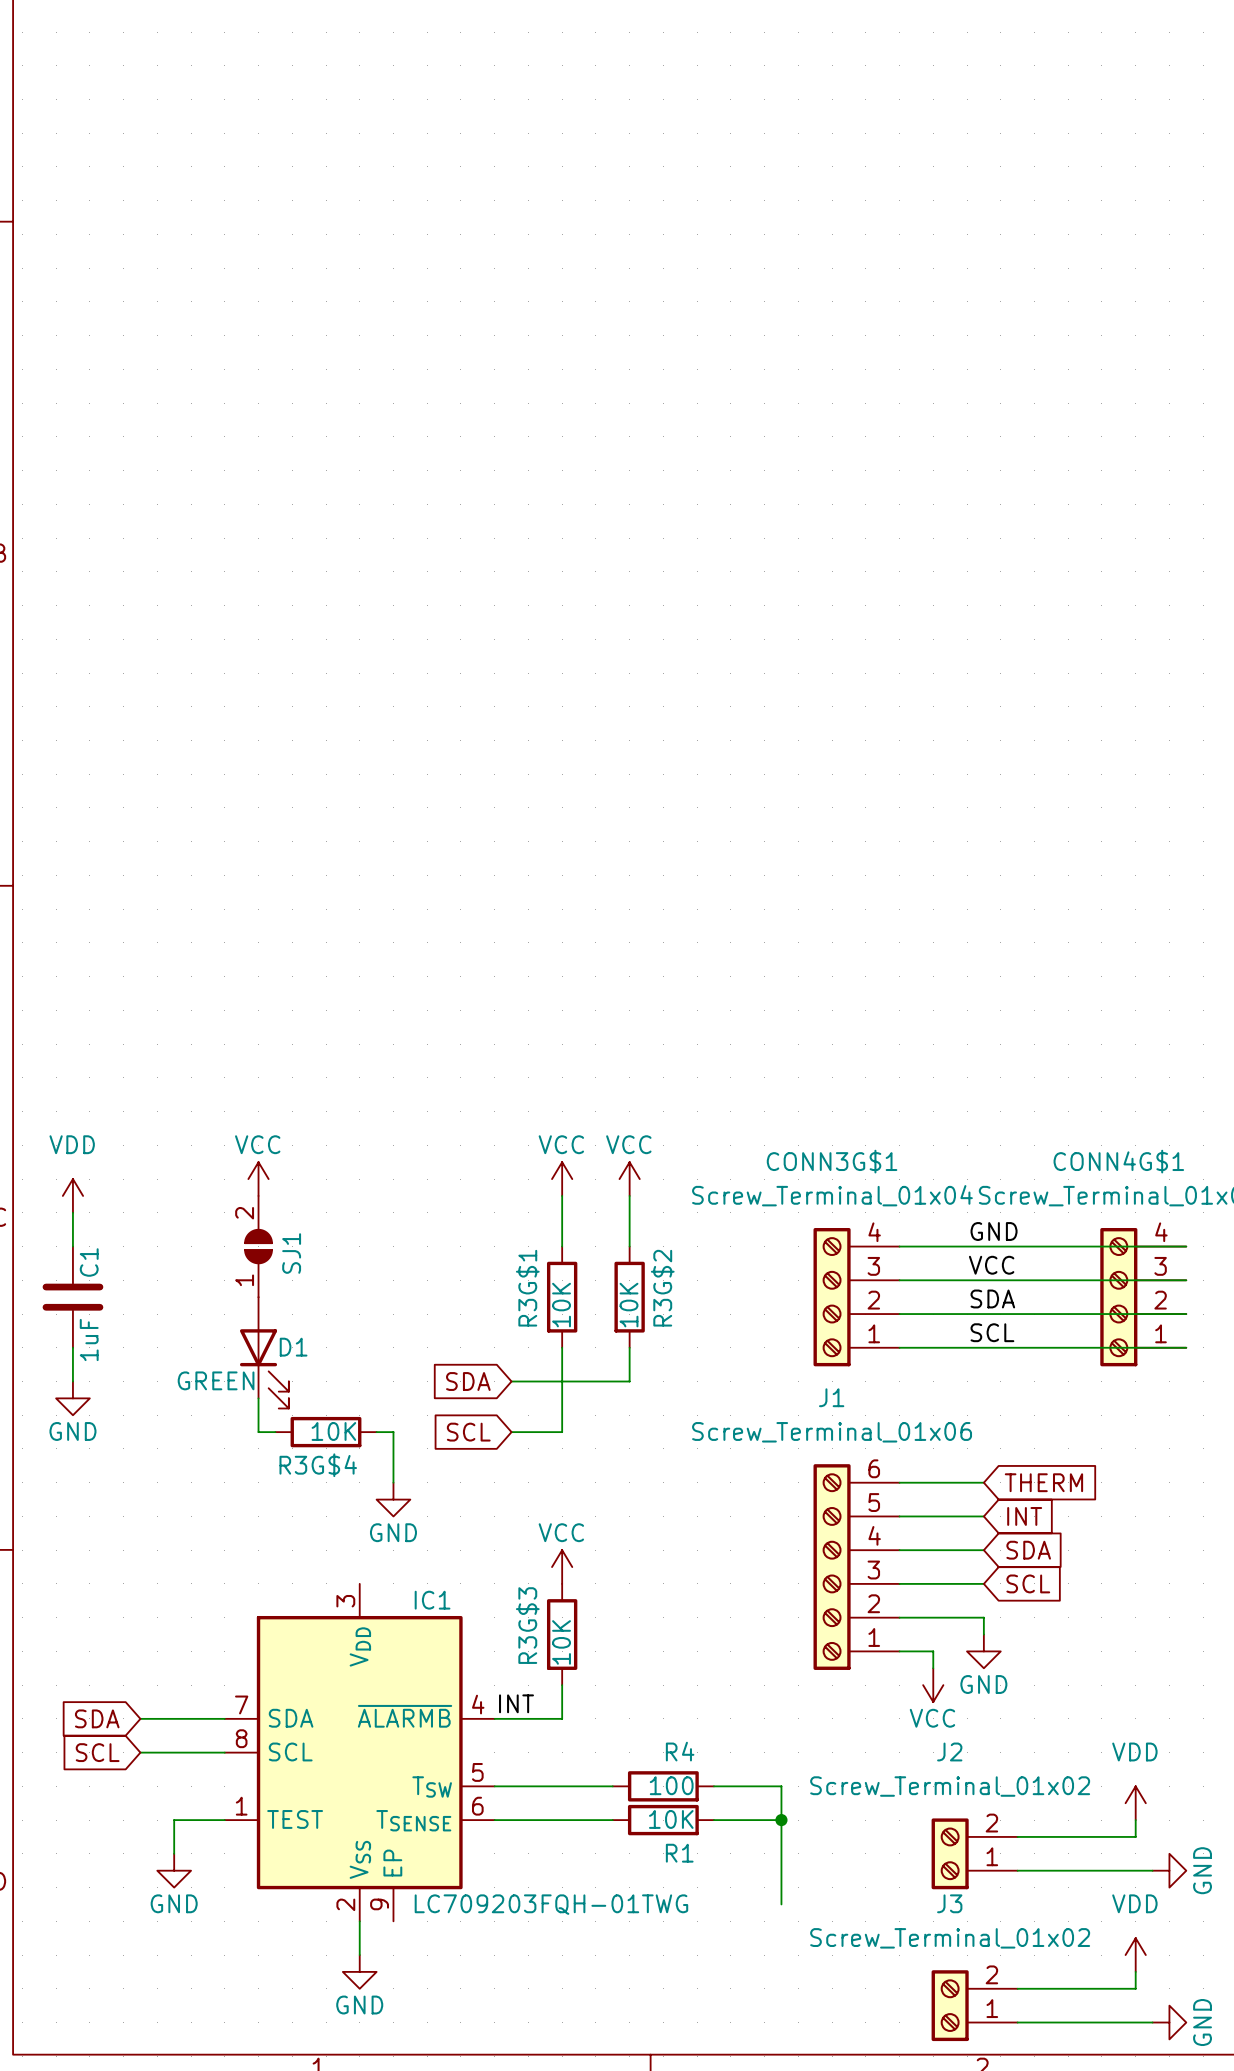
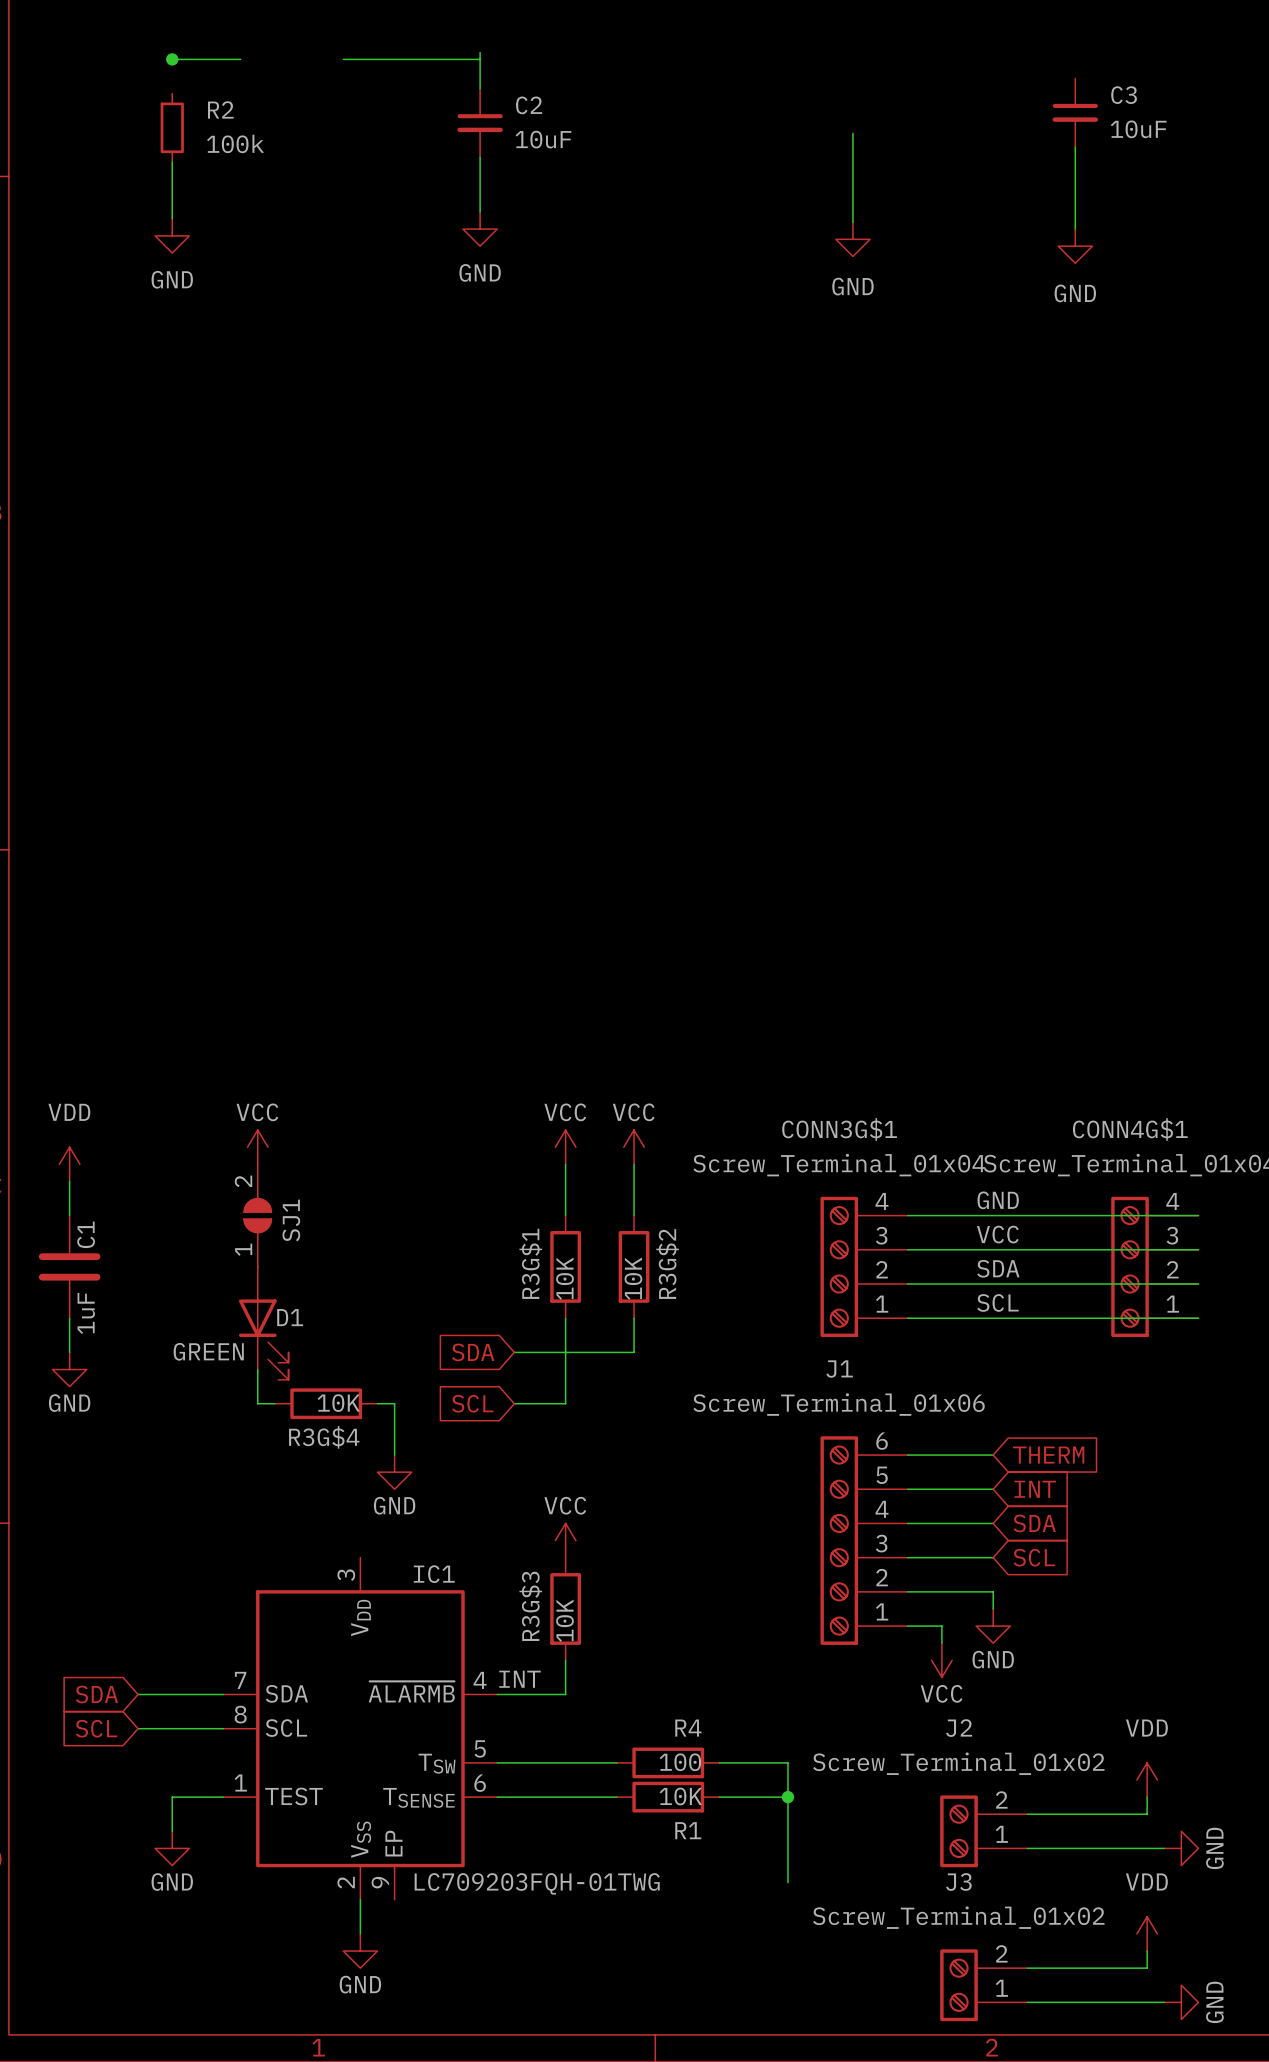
wire: none -> (480, 52) (480, 88)
wire: none -> (172, 59) (240, 59)
junction: none -> (172, 59)
wire: none -> (343, 59) (480, 59)
C3: none -> 10uF (1075, 112)
C2: none -> 10uF (480, 123)
R2: none -> 100k (172, 127)
wire: none -> (852, 133) (852, 222)
wire: none -> (1075, 146) (1075, 229)
wire: none -> (480, 157) (480, 211)
wire: none -> (172, 162) (172, 218)
power symbol: none -> GND (480, 229)
power symbol: none -> GND (172, 235)
power symbol: none -> GND (852, 239)
power symbol: none -> GND (1075, 246)

